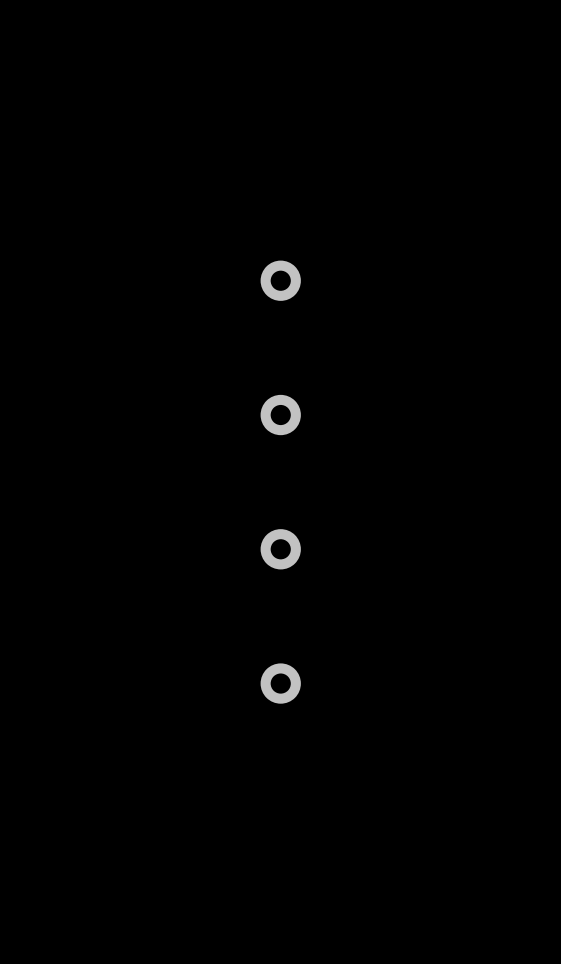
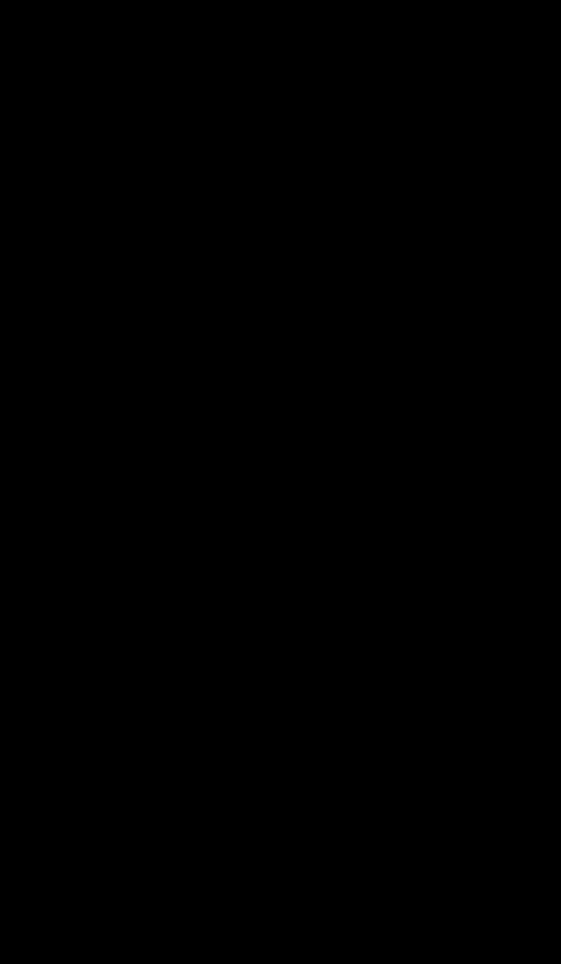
via: (280, 280) -> none
via: (280, 415) -> none
via: (280, 549) -> none
via: (280, 683) -> none

